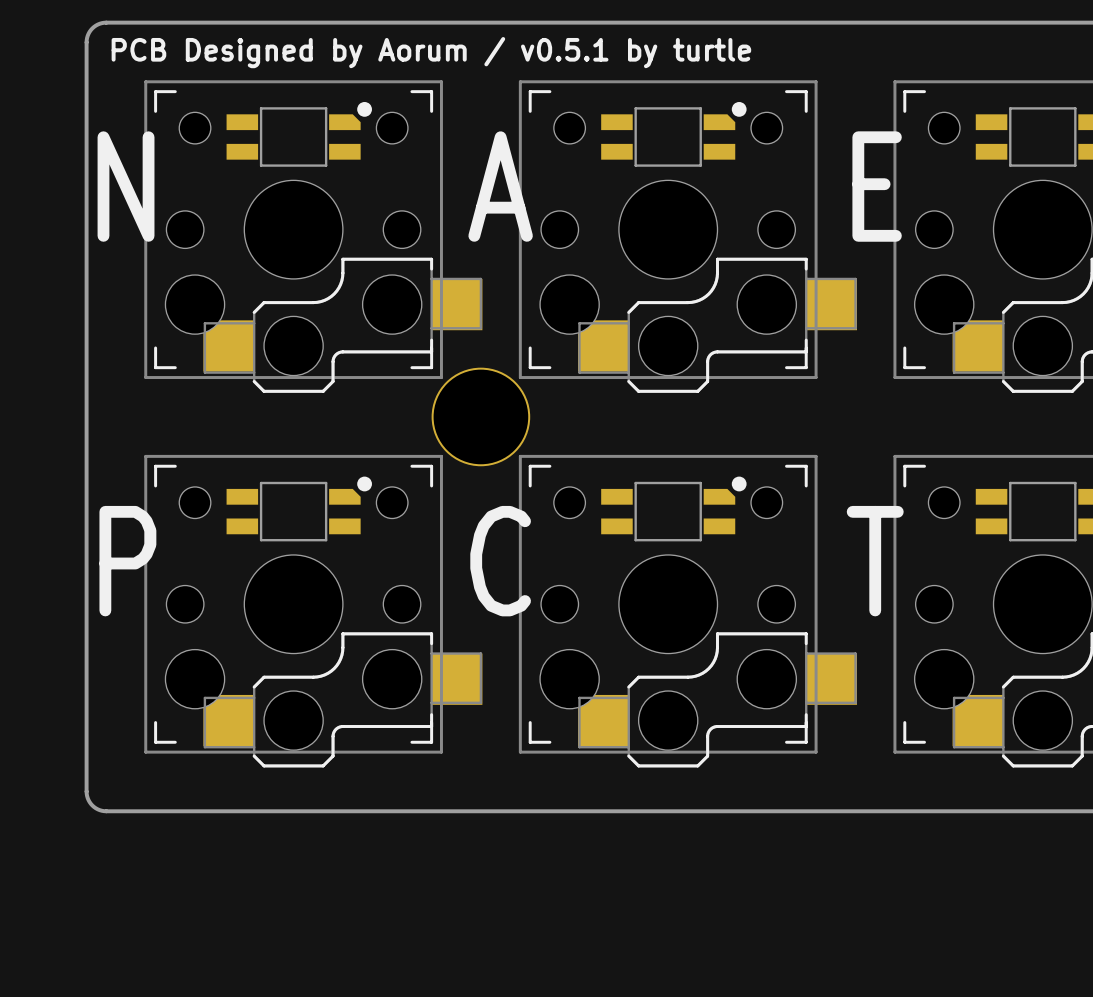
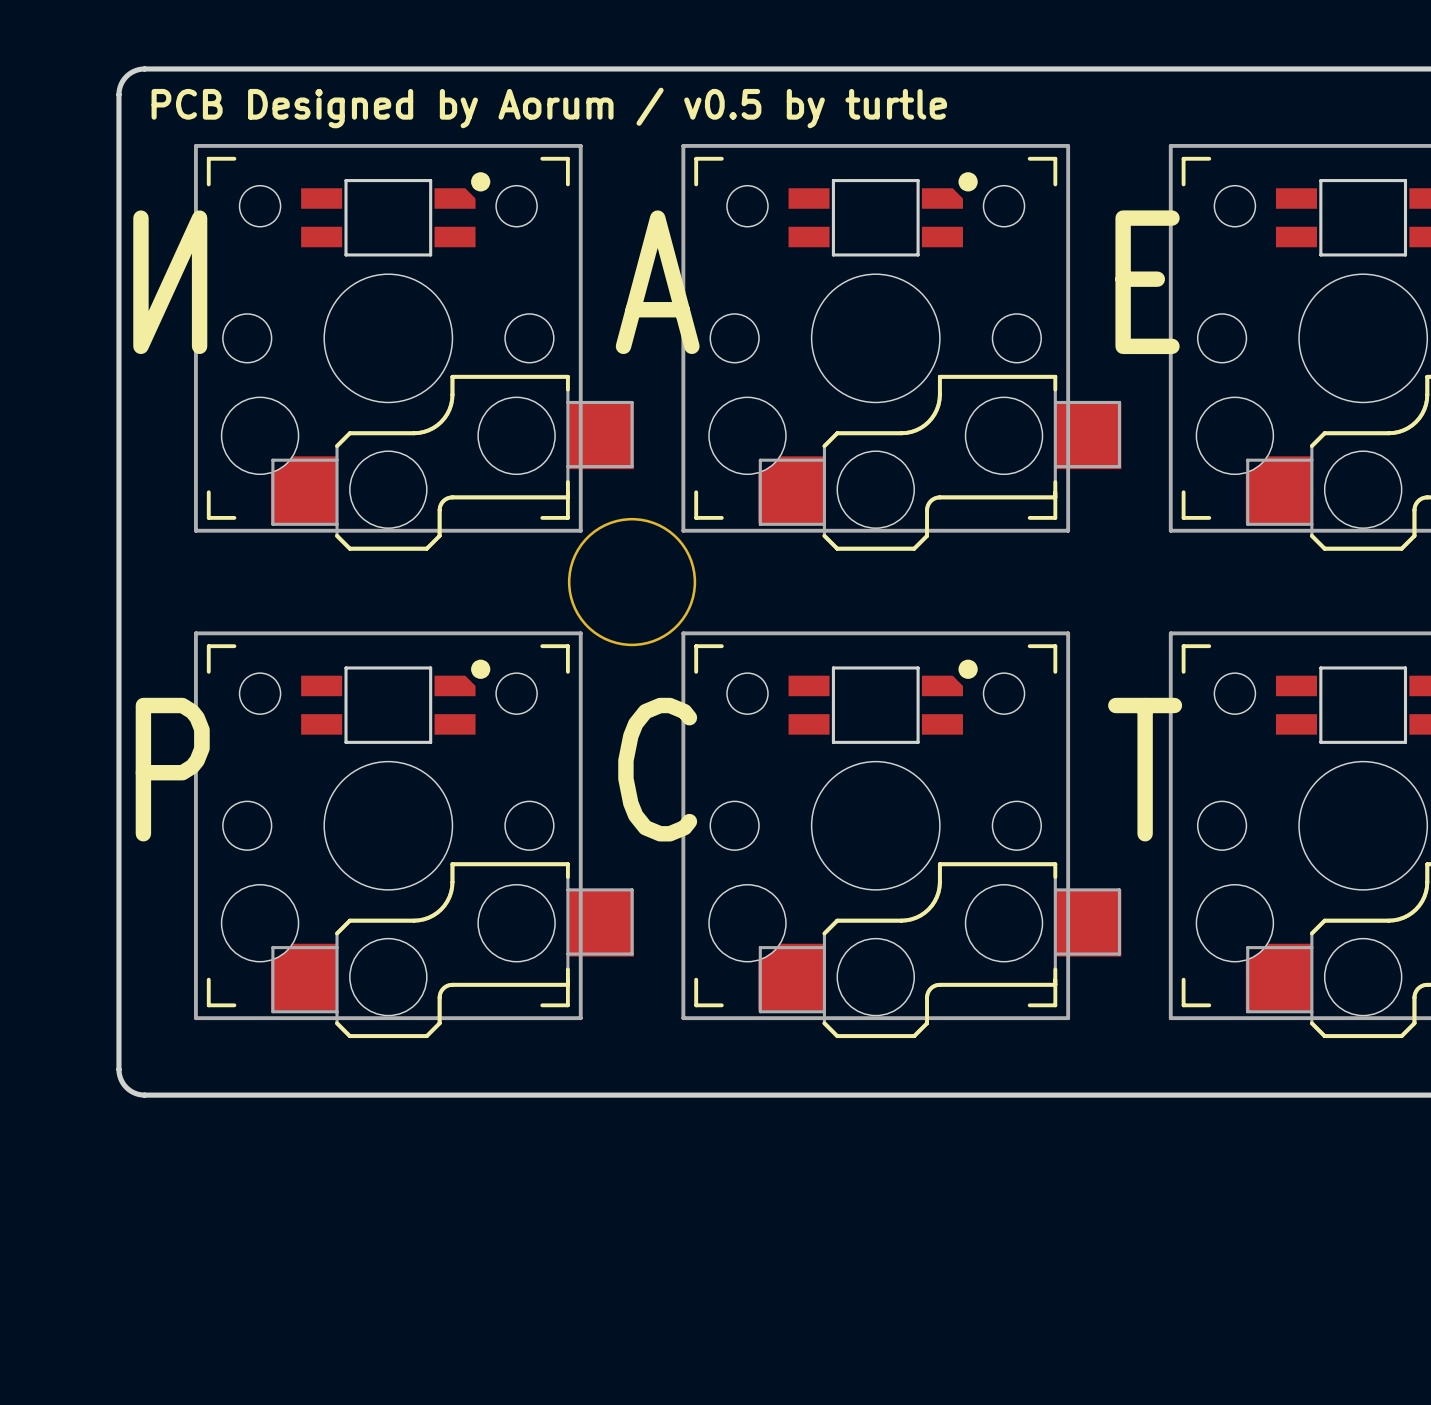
text: PCB Designed by Aorum / v0.5.1 by turtle (431, 52) -> PCB Designed by Aorum / v0.5 by turtle (549, 107)
text: N (126, 186) -> И (170, 282)

